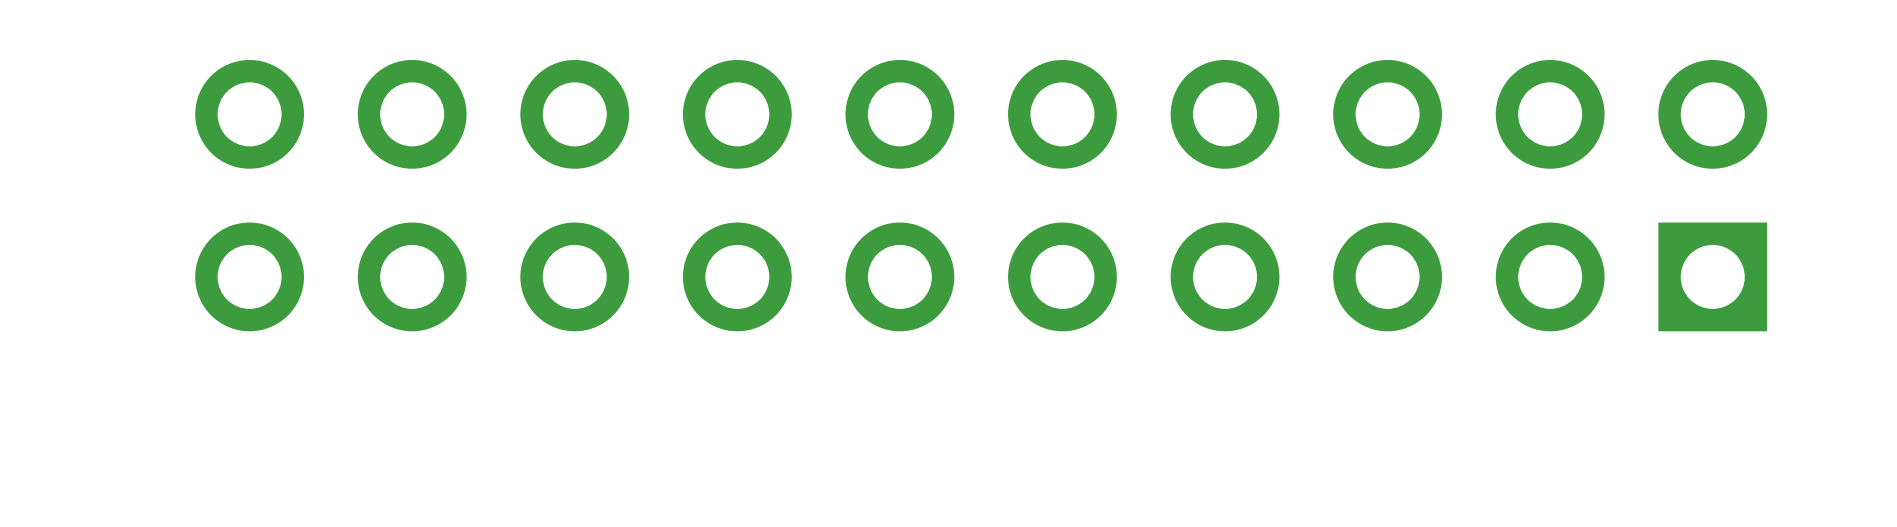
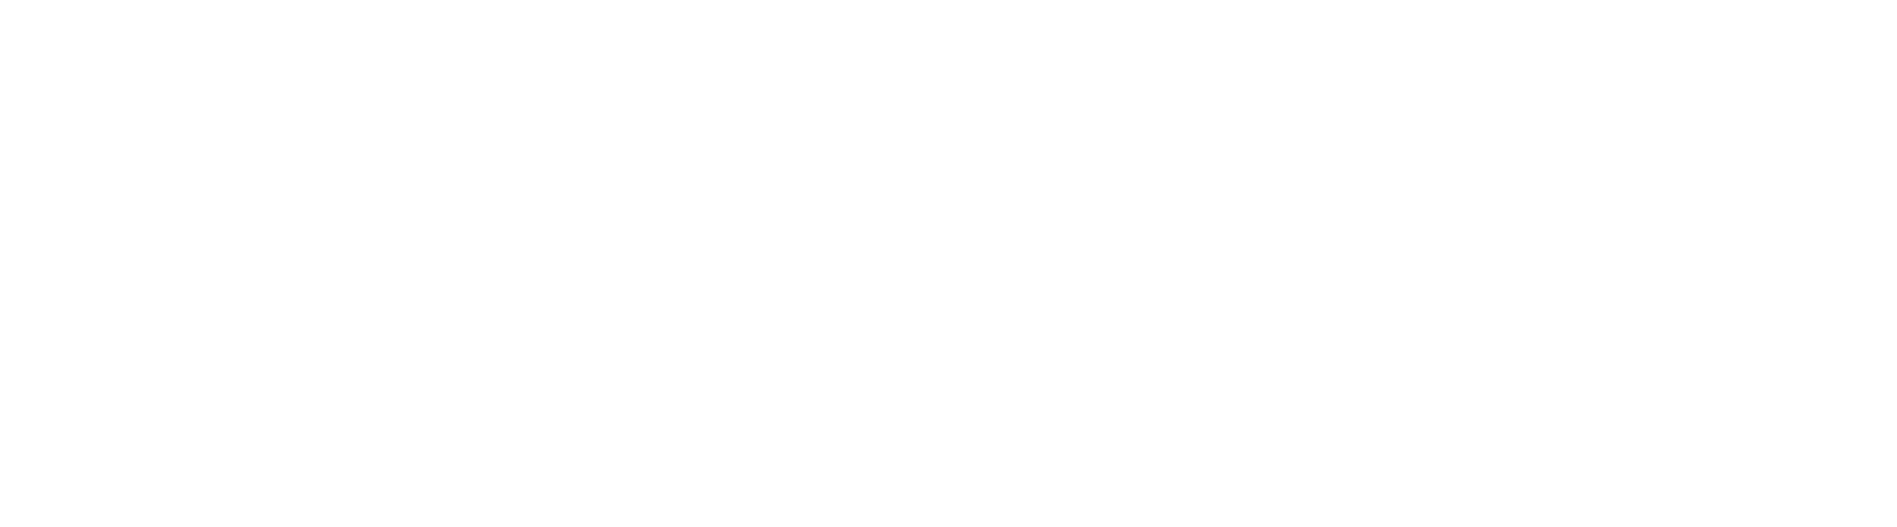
part: (981, 195) -> none

